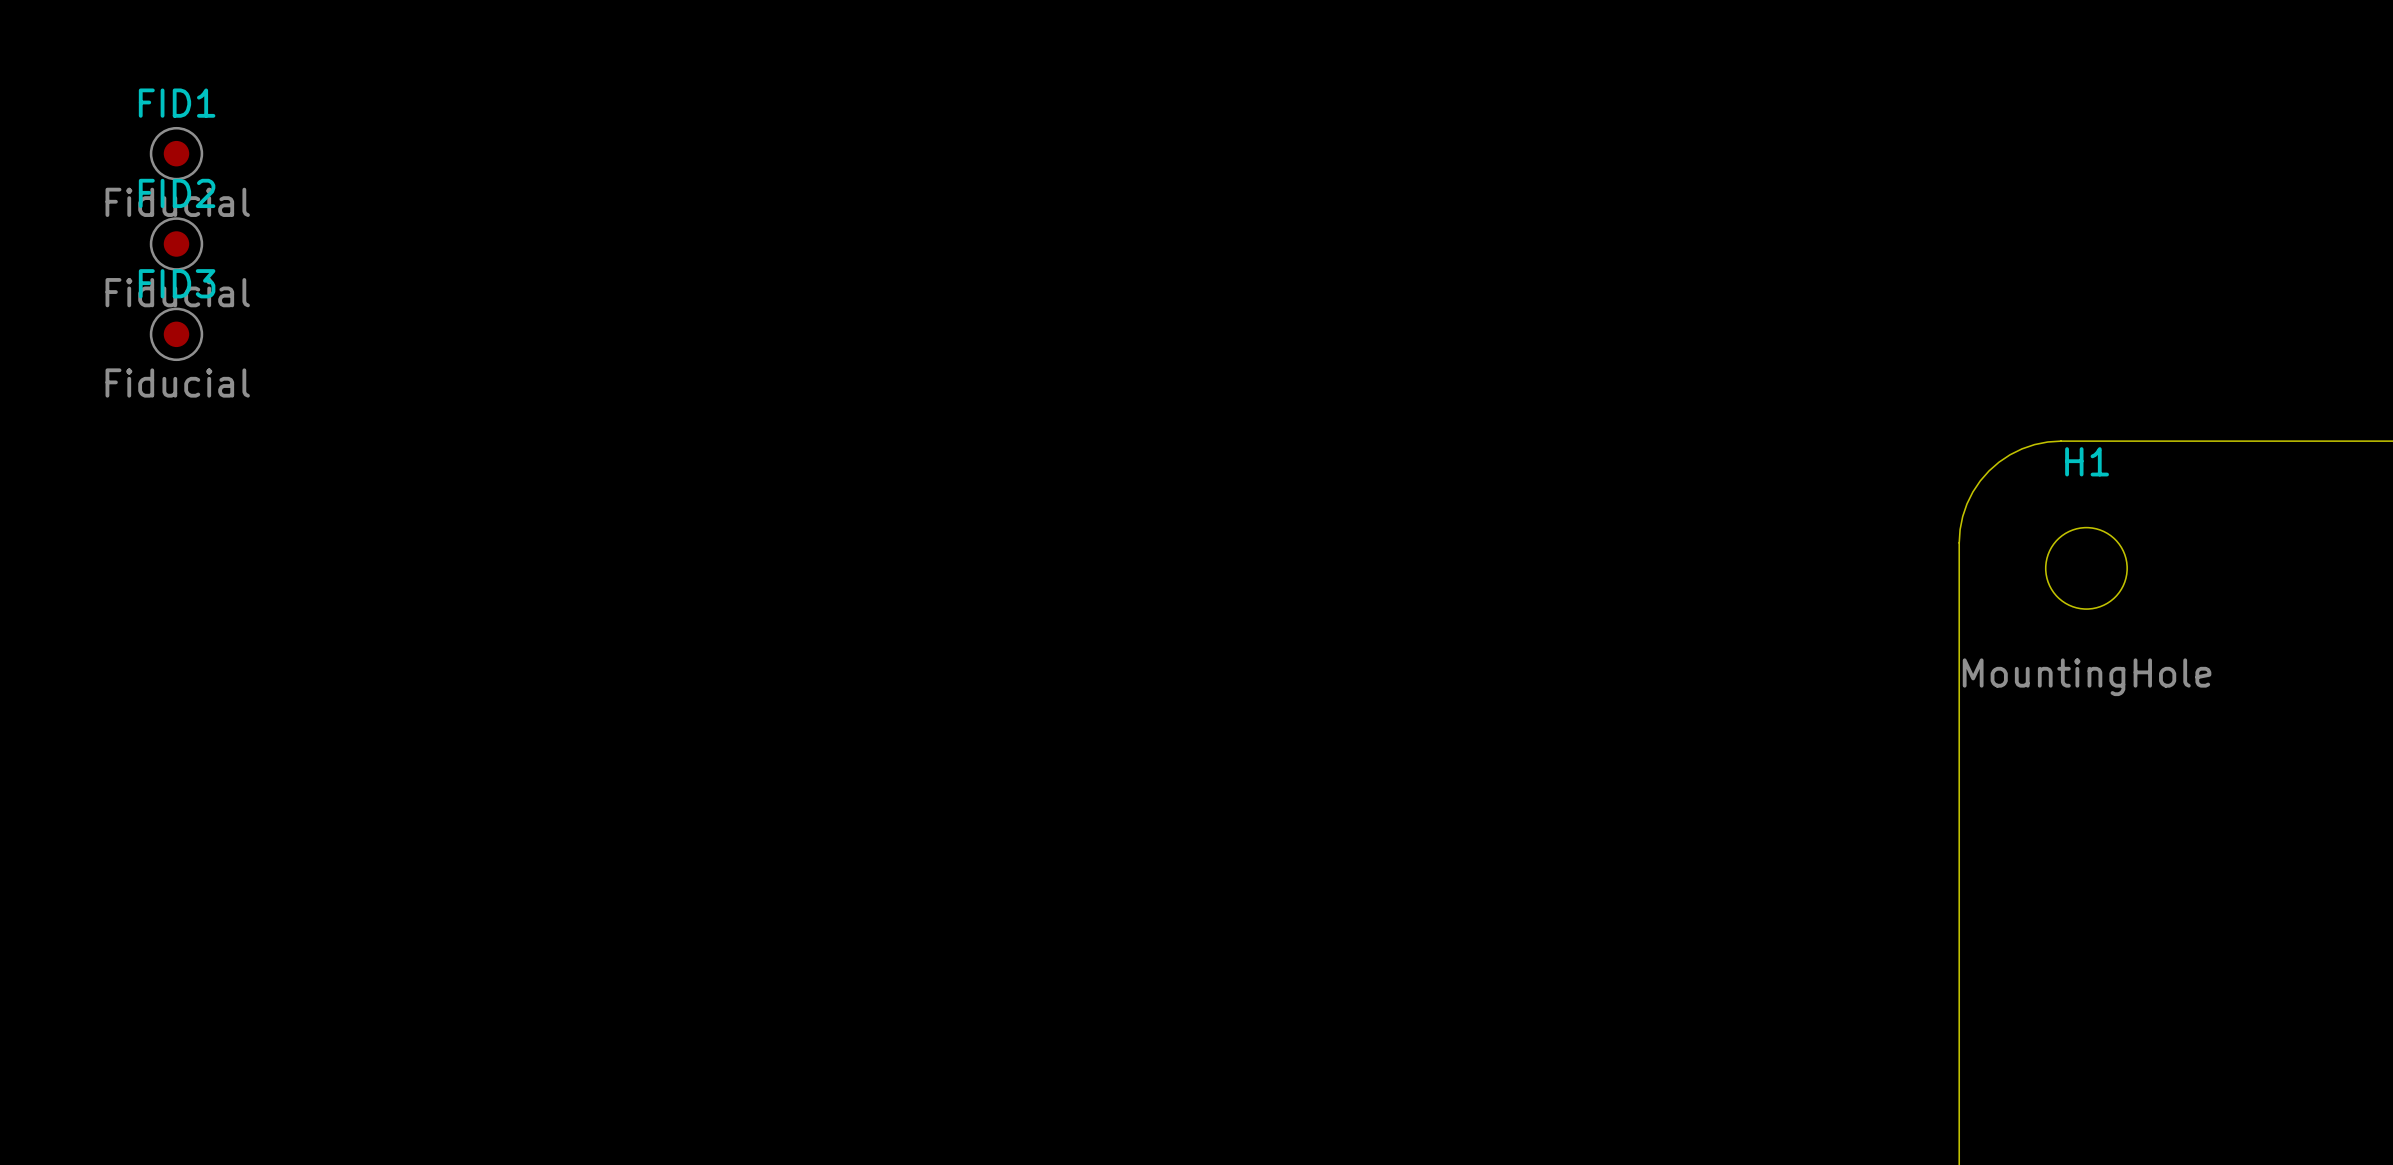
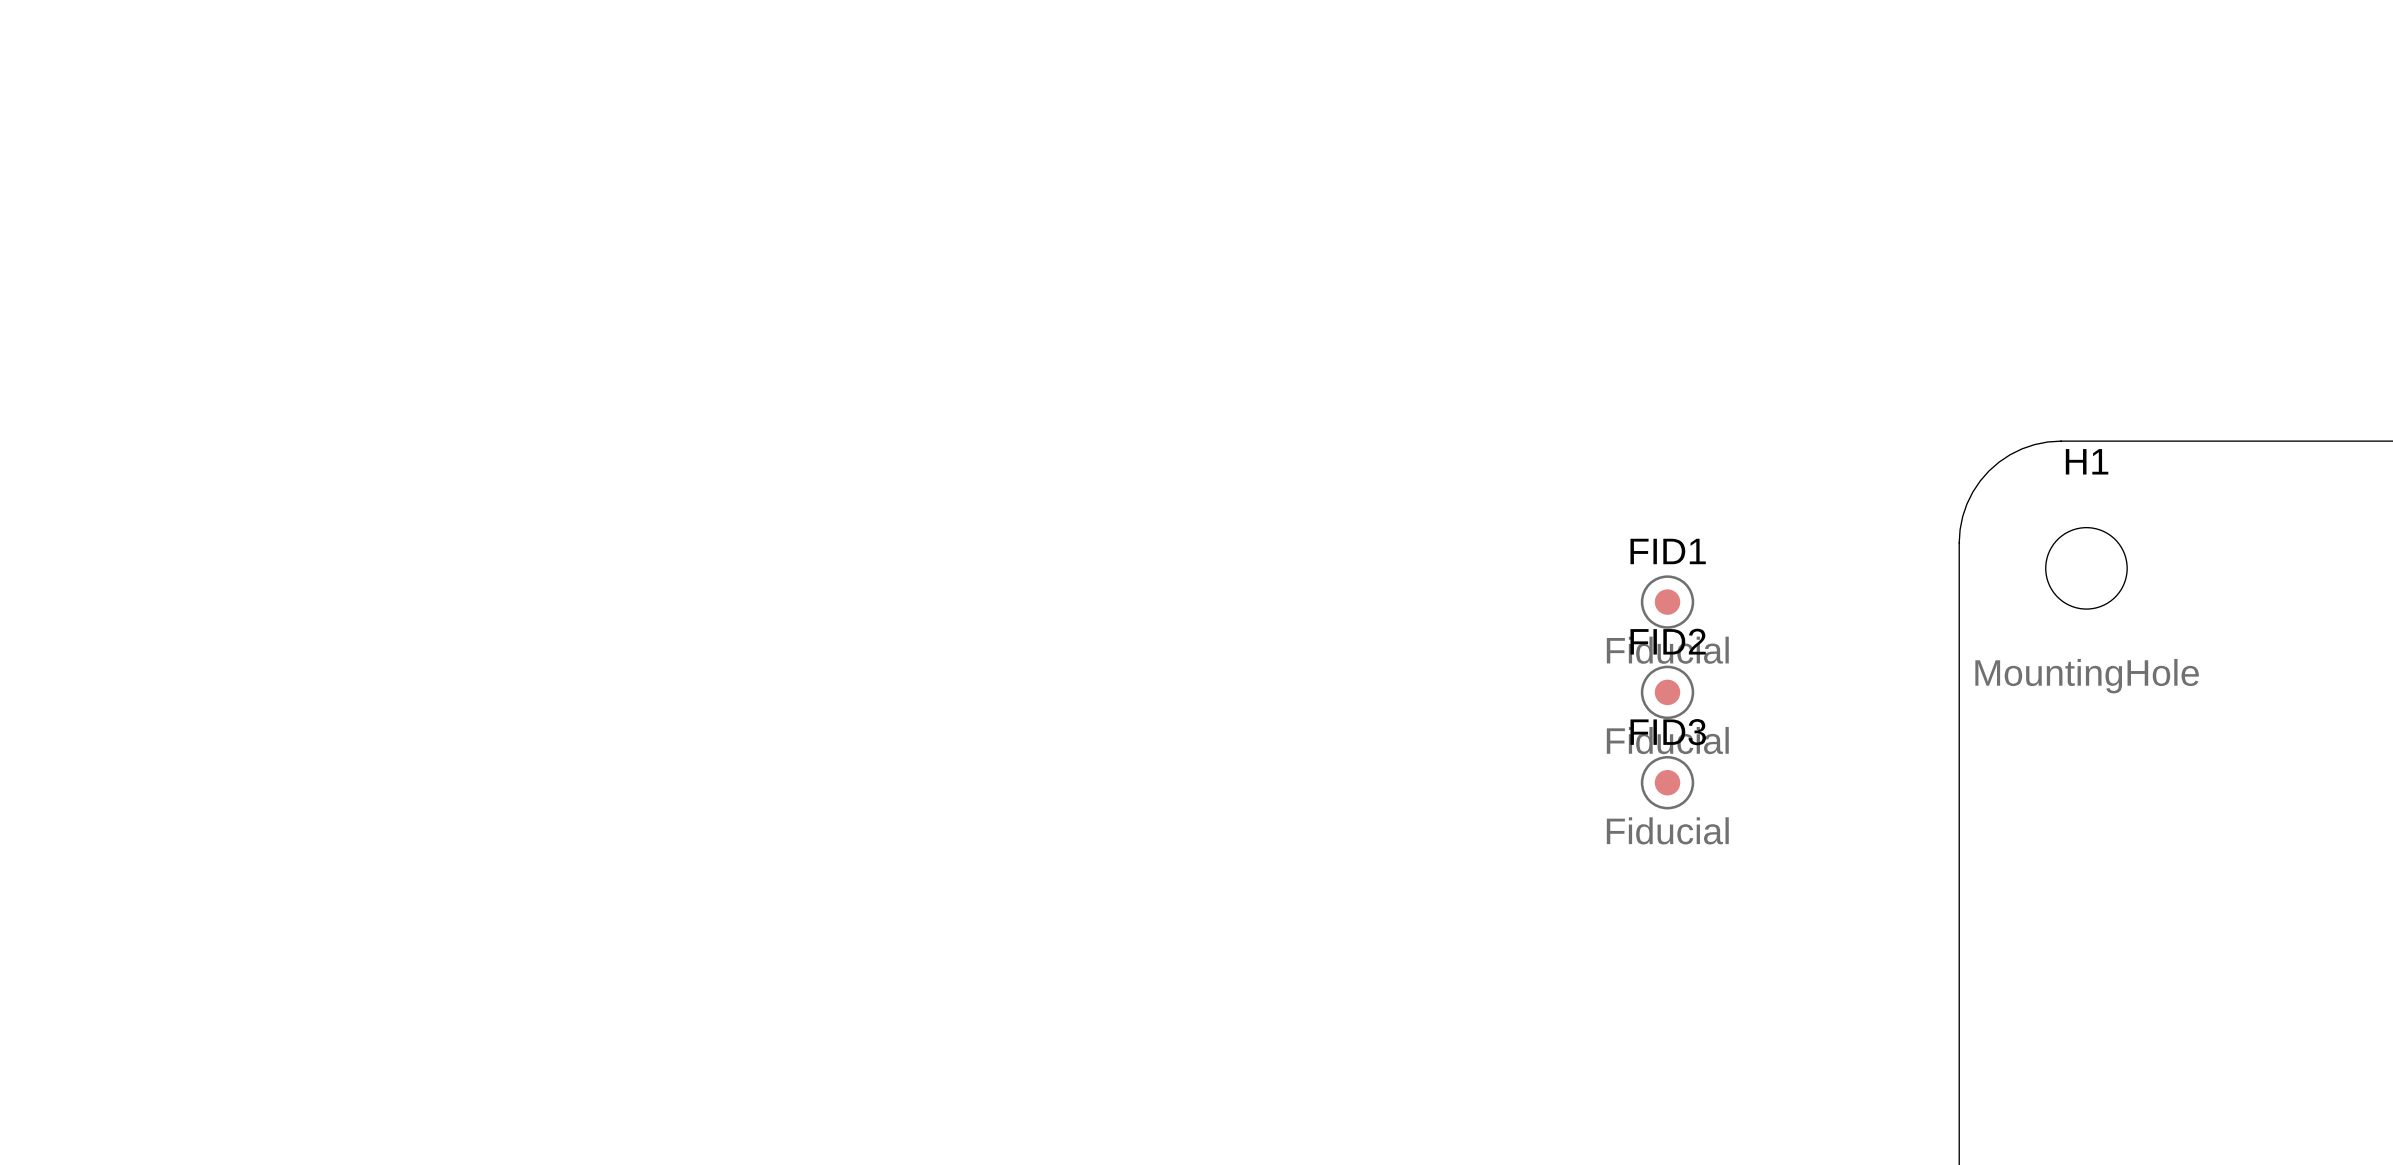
FID1 position: (176, 153) -> (1667, 602)
FID2 position: (176, 244) -> (1667, 692)
FID3 position: (176, 334) -> (1667, 782)

